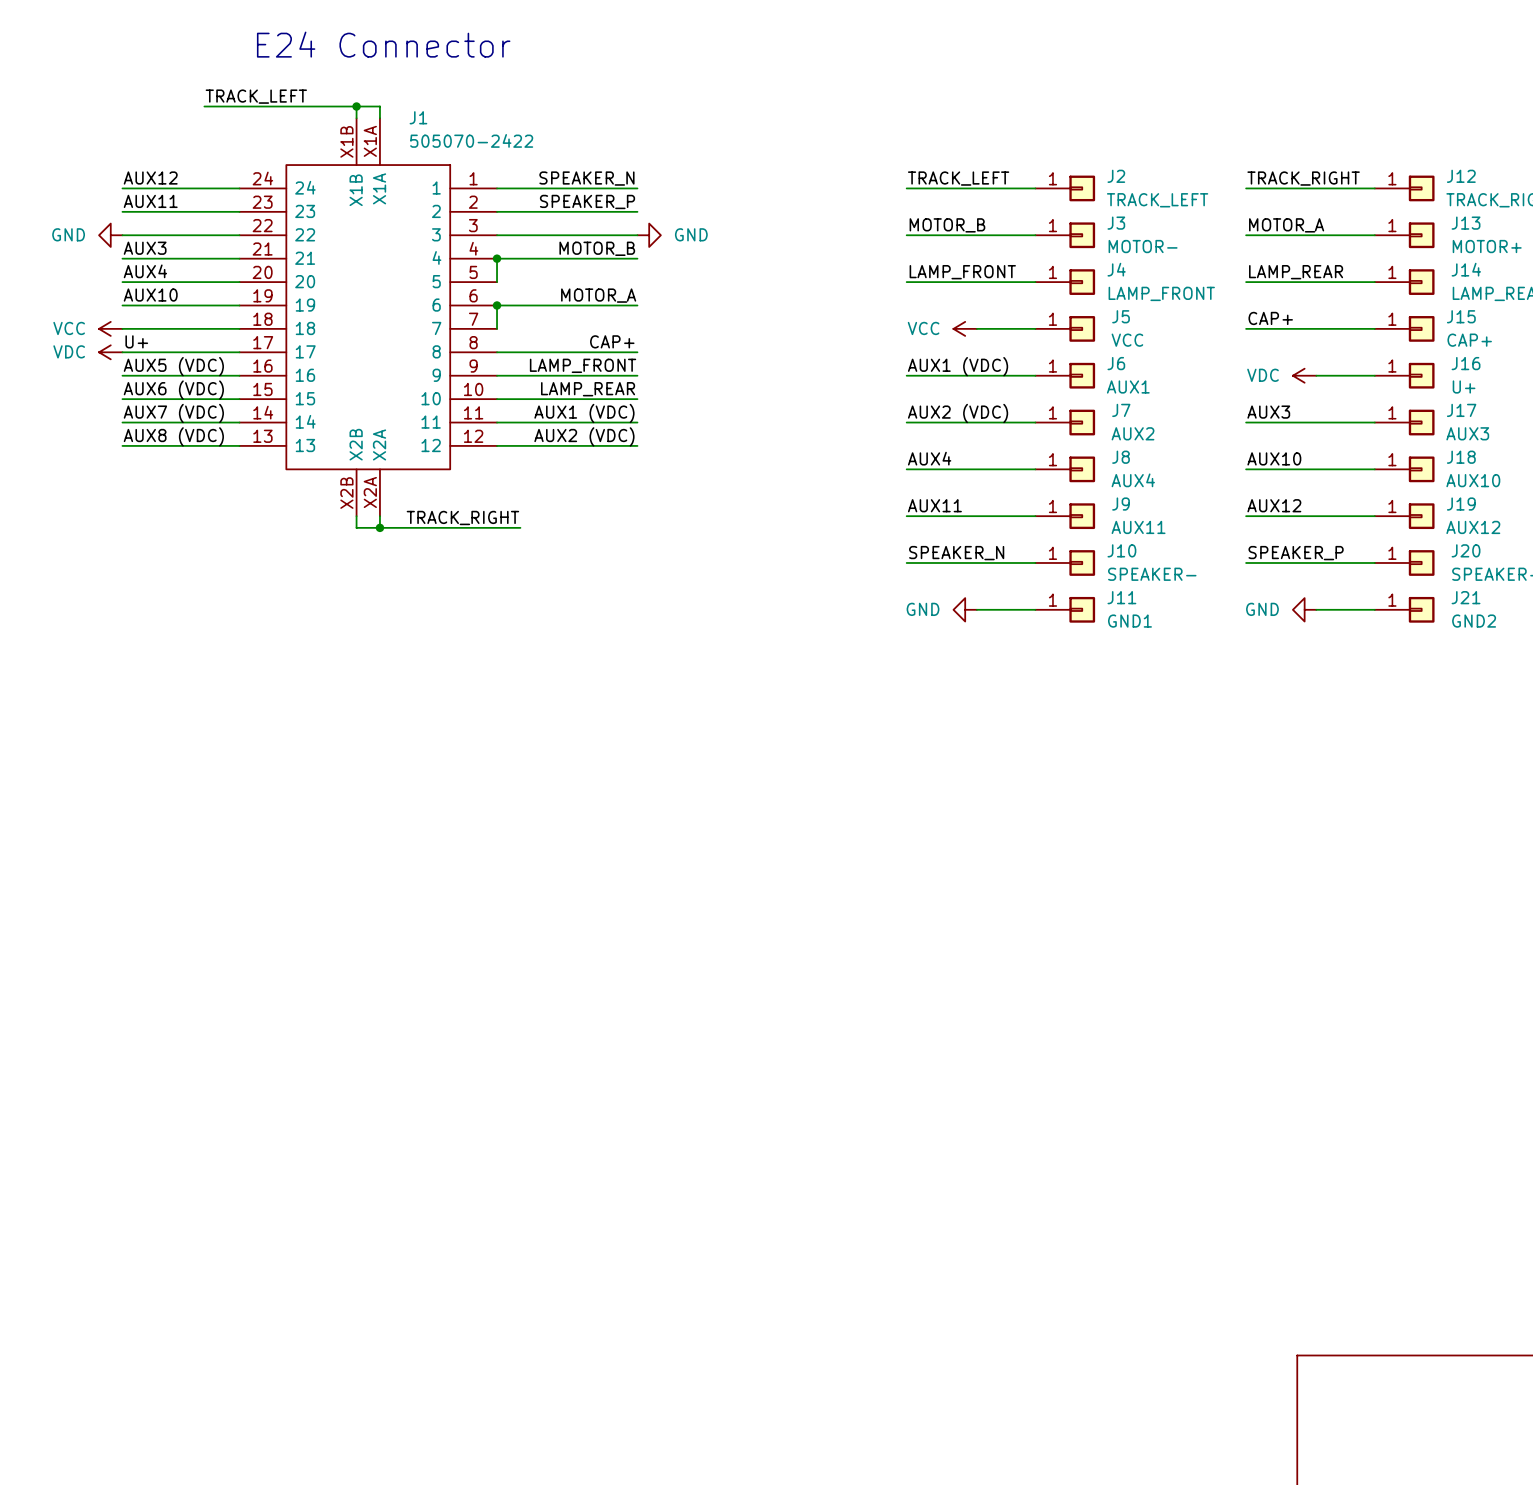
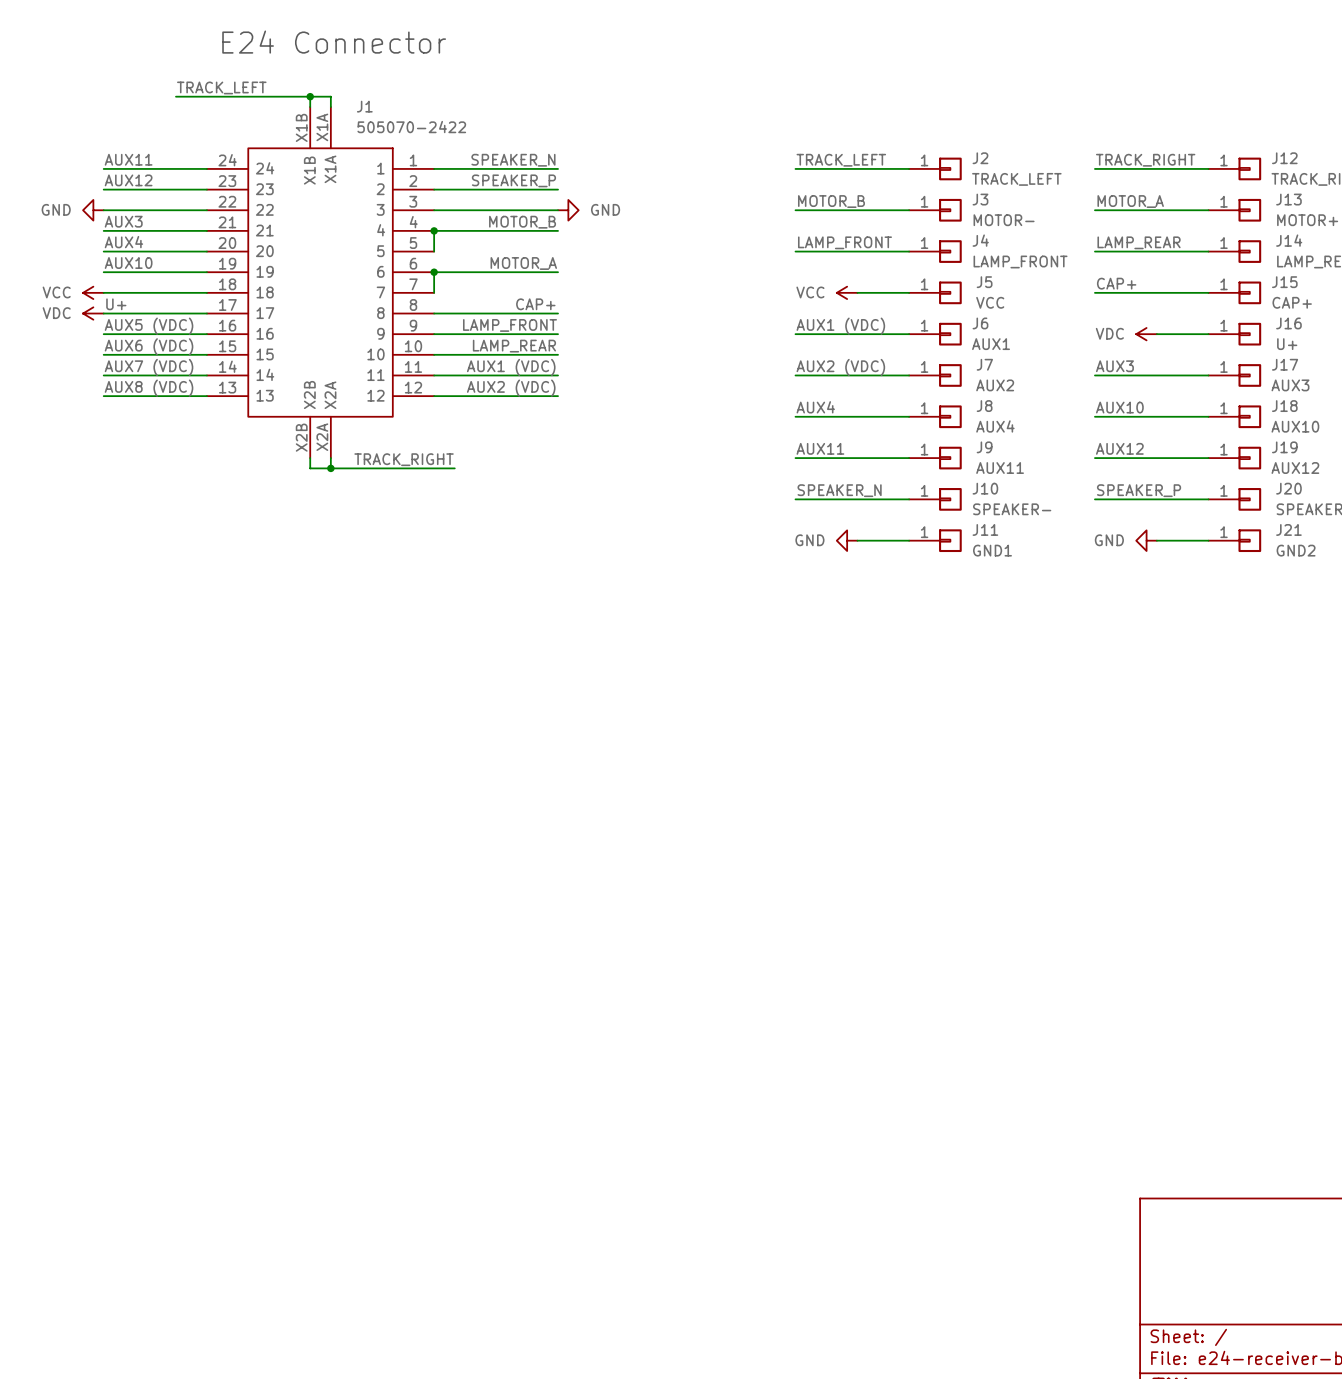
label: AUX12 (150, 178) -> AUX11 (128, 159)
label: AUX11 (150, 201) -> AUX12 (128, 180)

